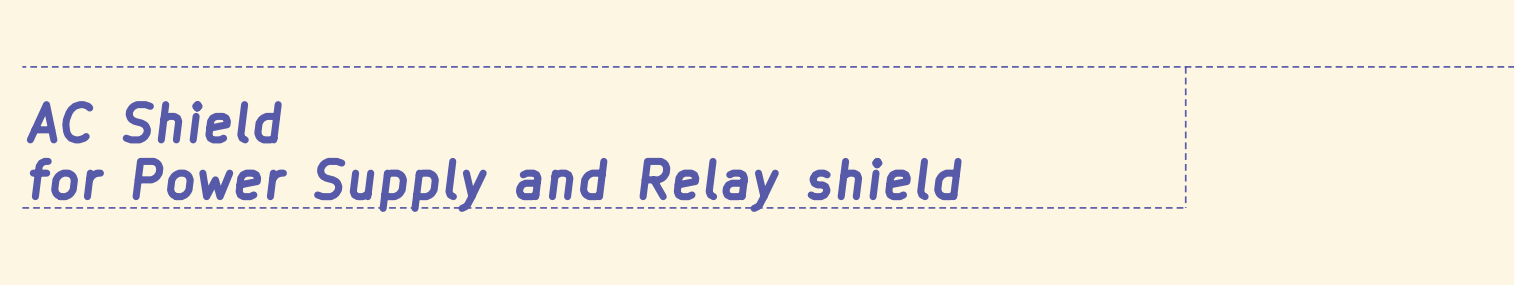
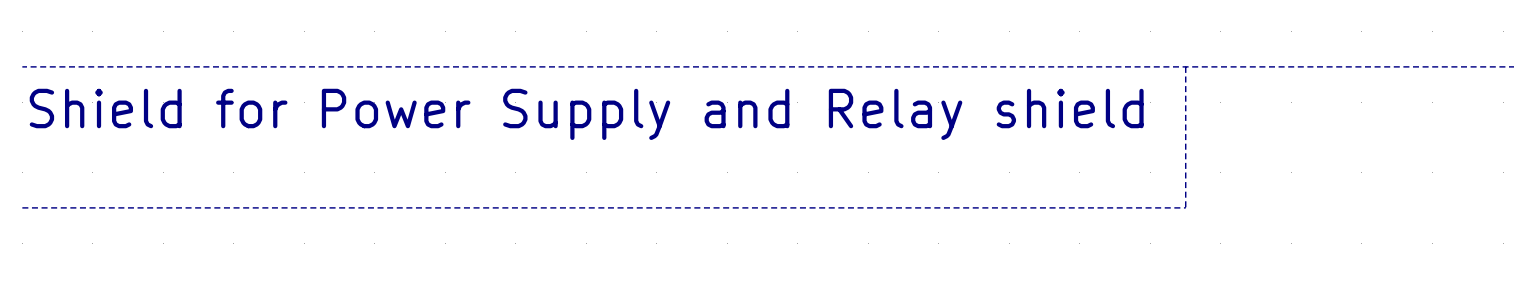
text: AC Shield (154, 122) -> Shield for Power Supply and Relay shield (586, 114)
text: for Power Supply and Relay shield (495, 184) -> none

